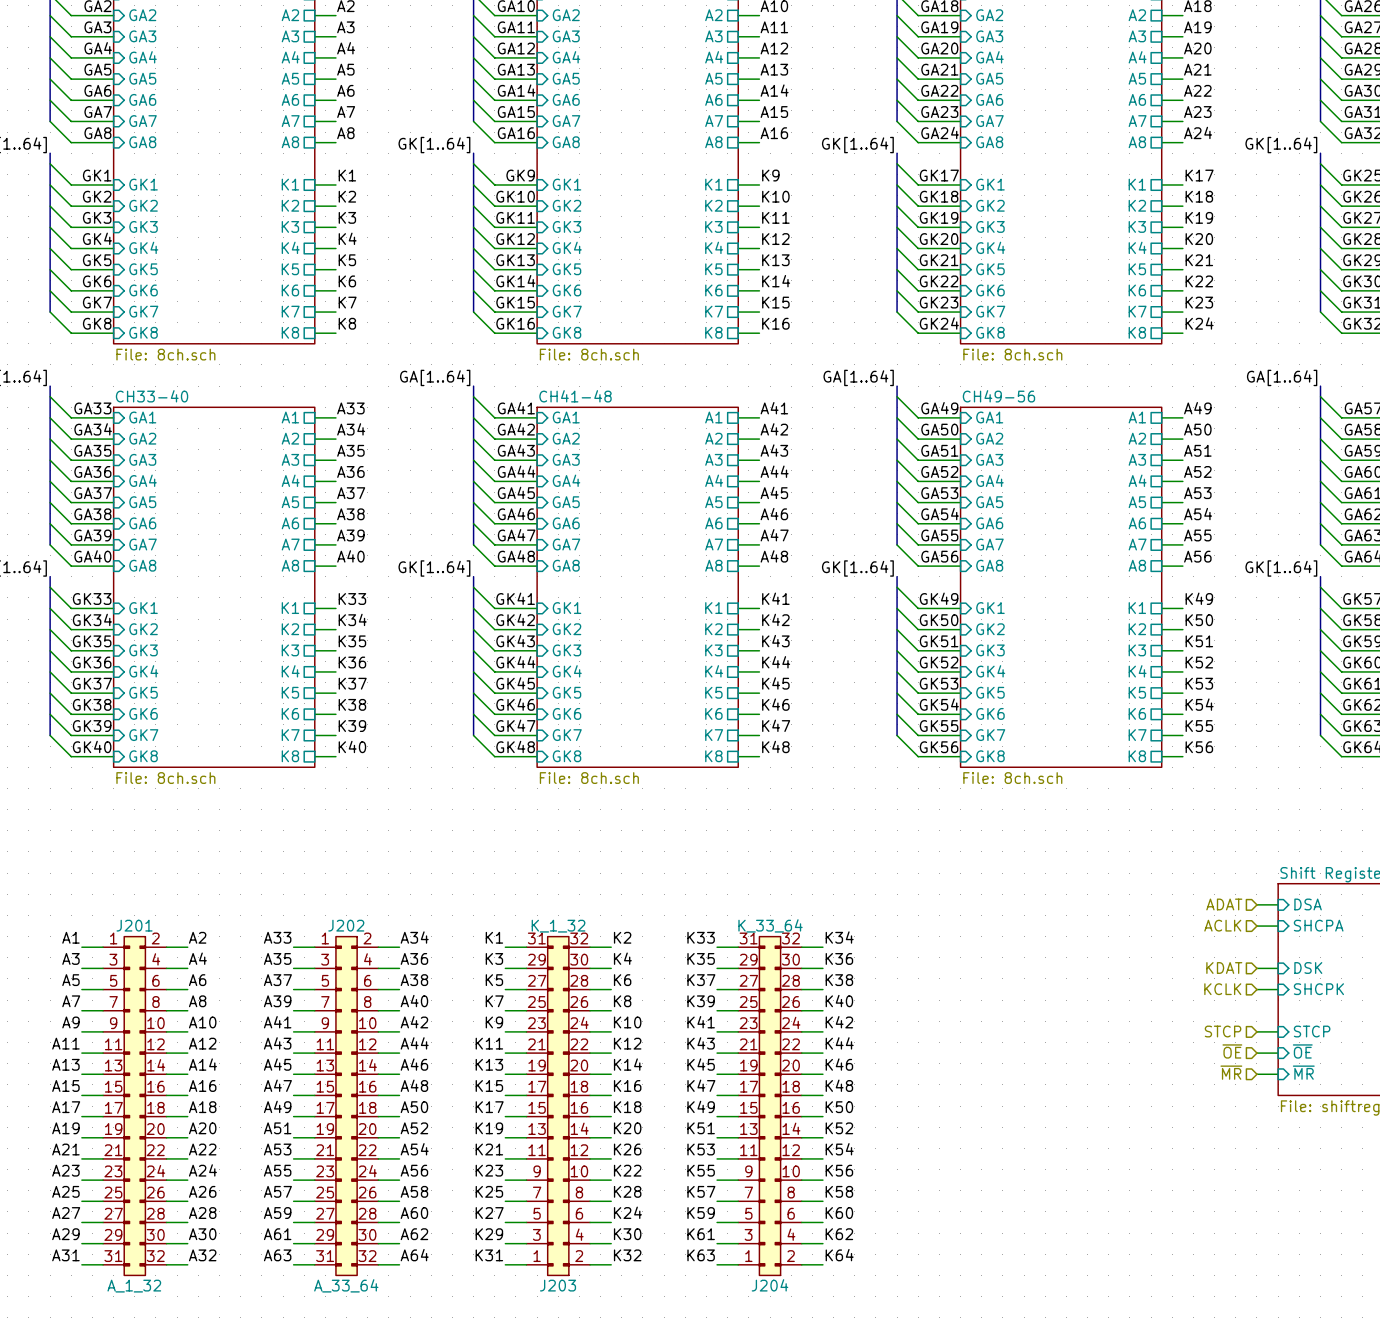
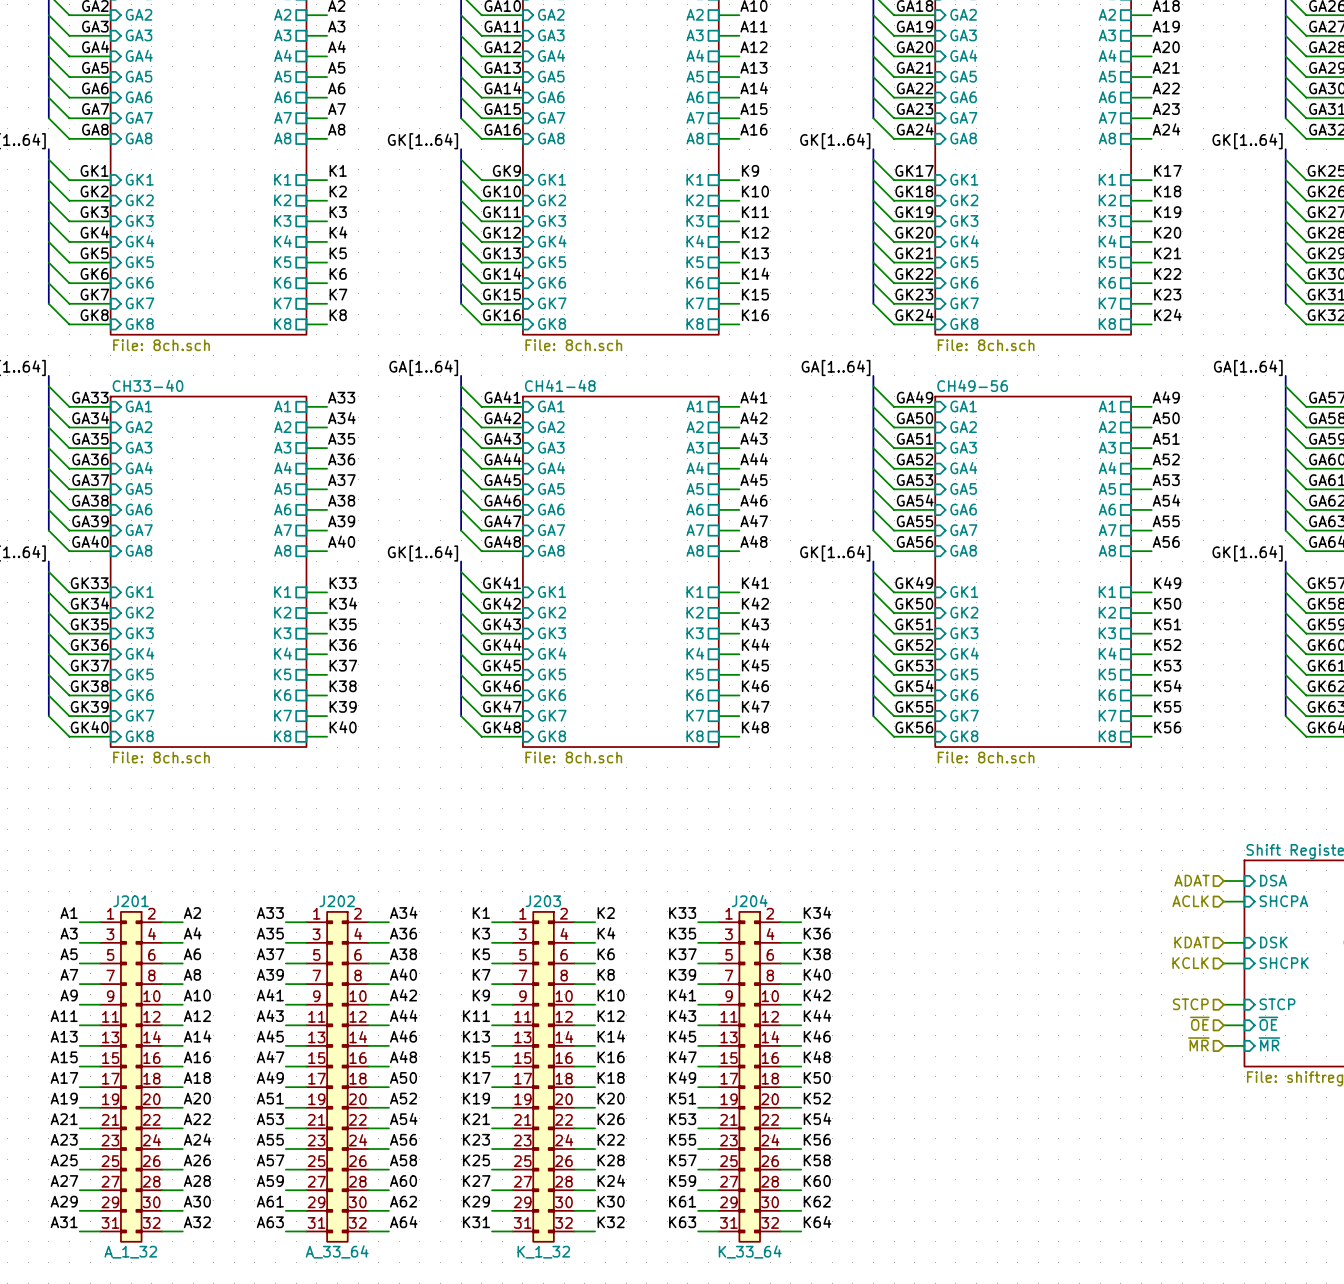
J203 flip: as is (558, 1106) -> up-down (543, 1076)
J204 flip: as is (770, 1106) -> up-down (749, 1076)

